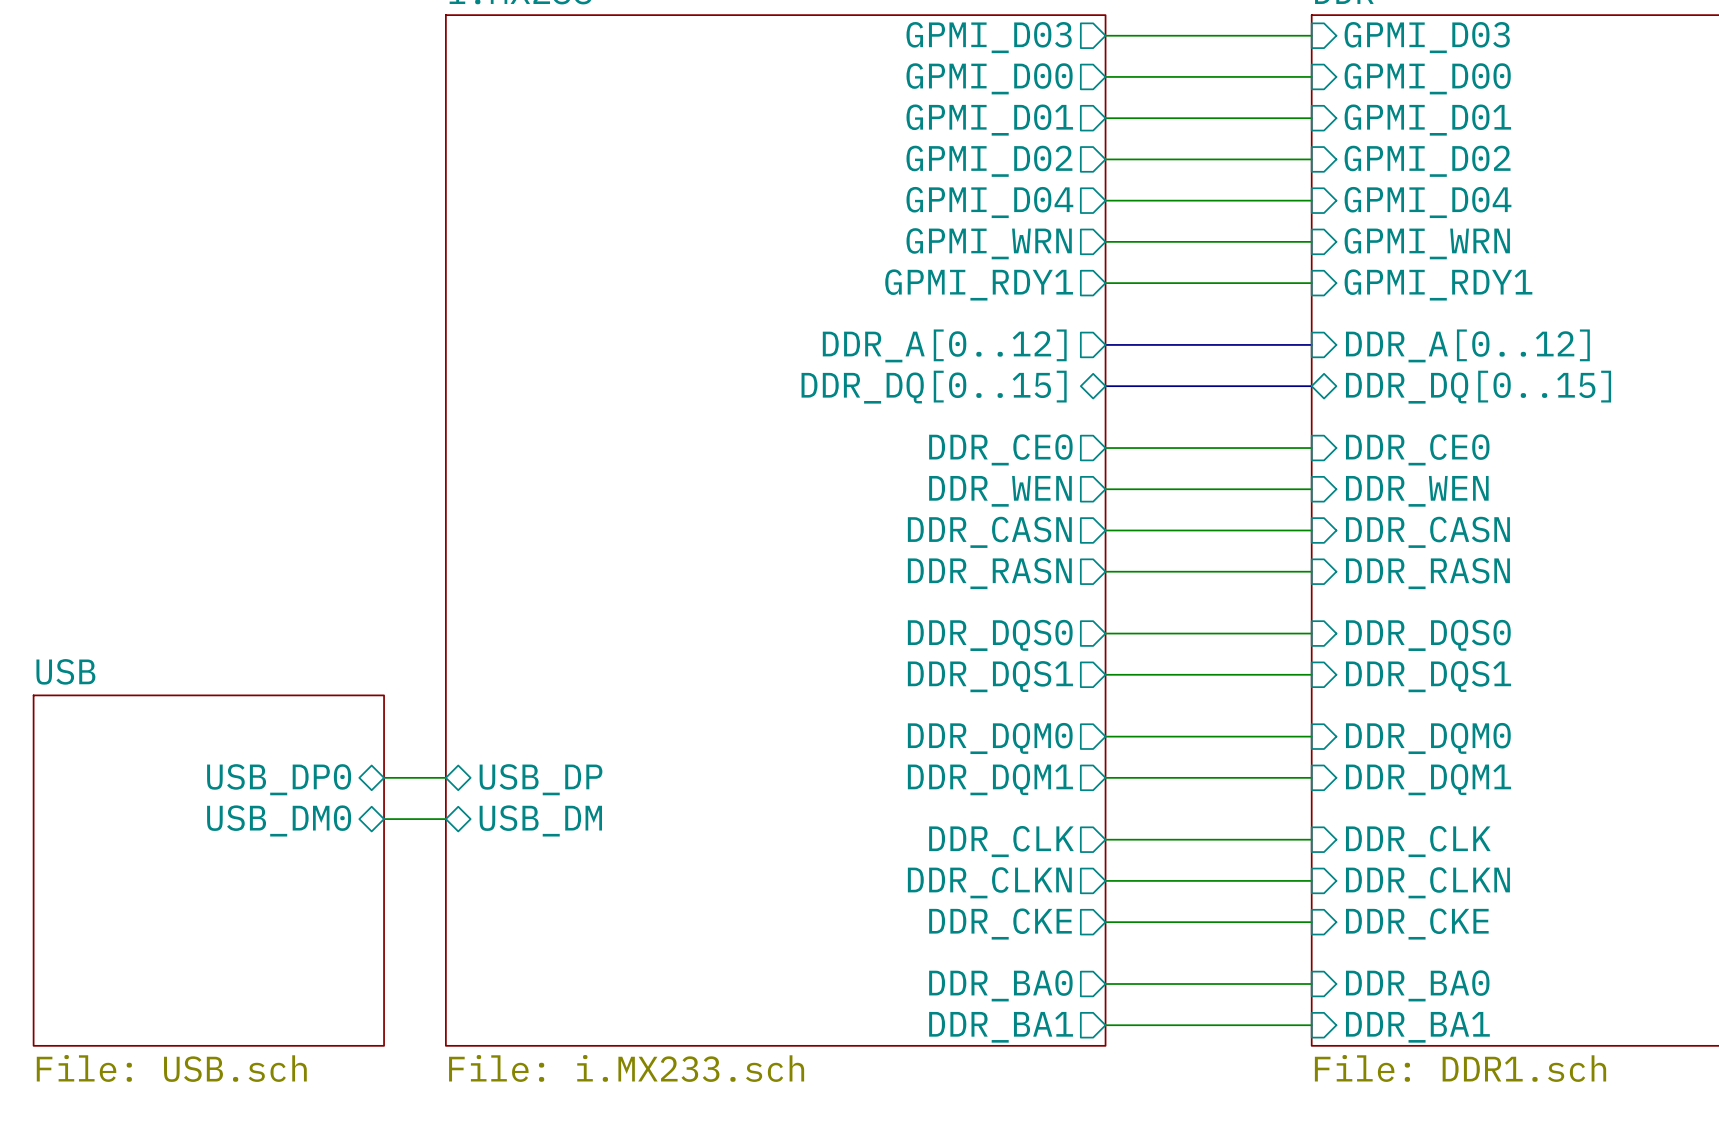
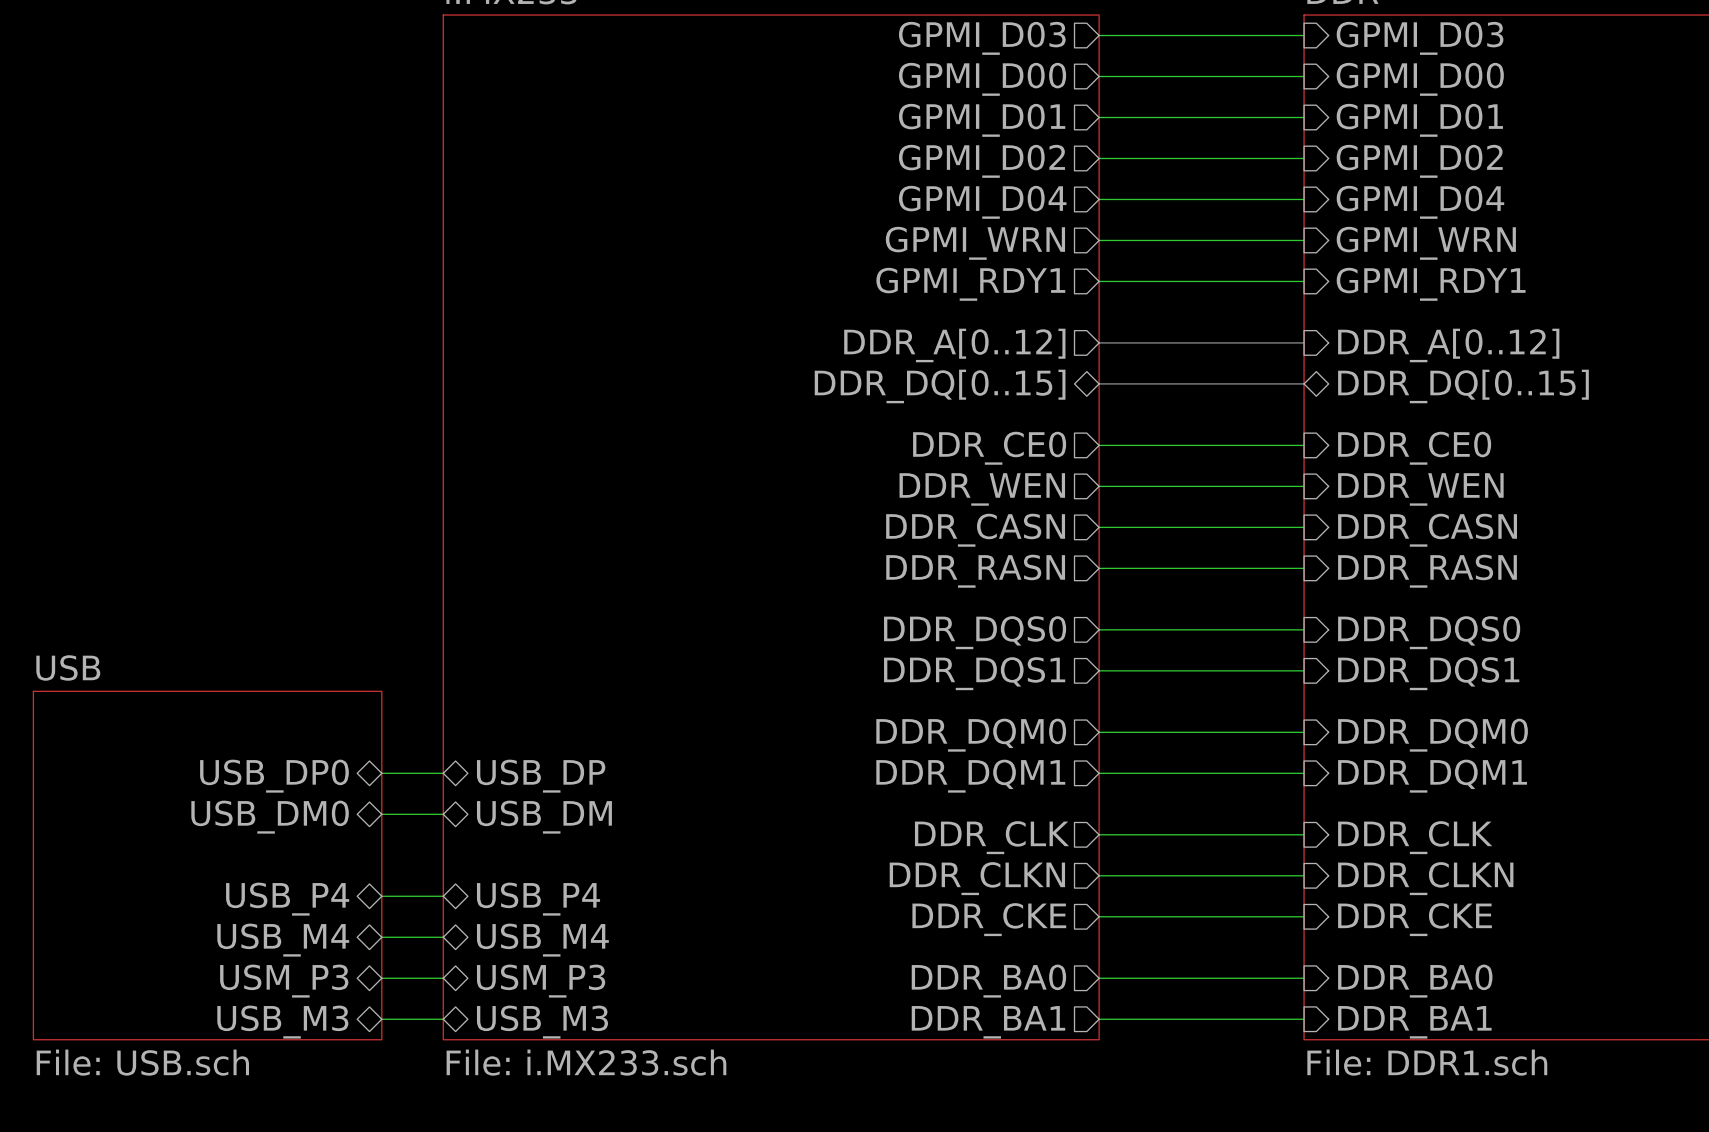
wire: none -> (381, 896) (443, 896)
sheet pin: none -> USB_P4 (287, 899)
sheet pin: none -> USB_P4 (538, 899)
wire: none -> (381, 937) (443, 937)
sheet pin: none -> USB_M4 (283, 940)
sheet pin: none -> USB_M4 (542, 940)
wire: none -> (381, 978) (443, 978)
sheet pin: none -> USM_P3 (284, 981)
sheet pin: none -> USM_P3 (541, 981)
wire: none -> (381, 1019) (443, 1019)
sheet pin: none -> USB_M3 (282, 1022)
sheet pin: none -> USB_M3 (542, 1022)

